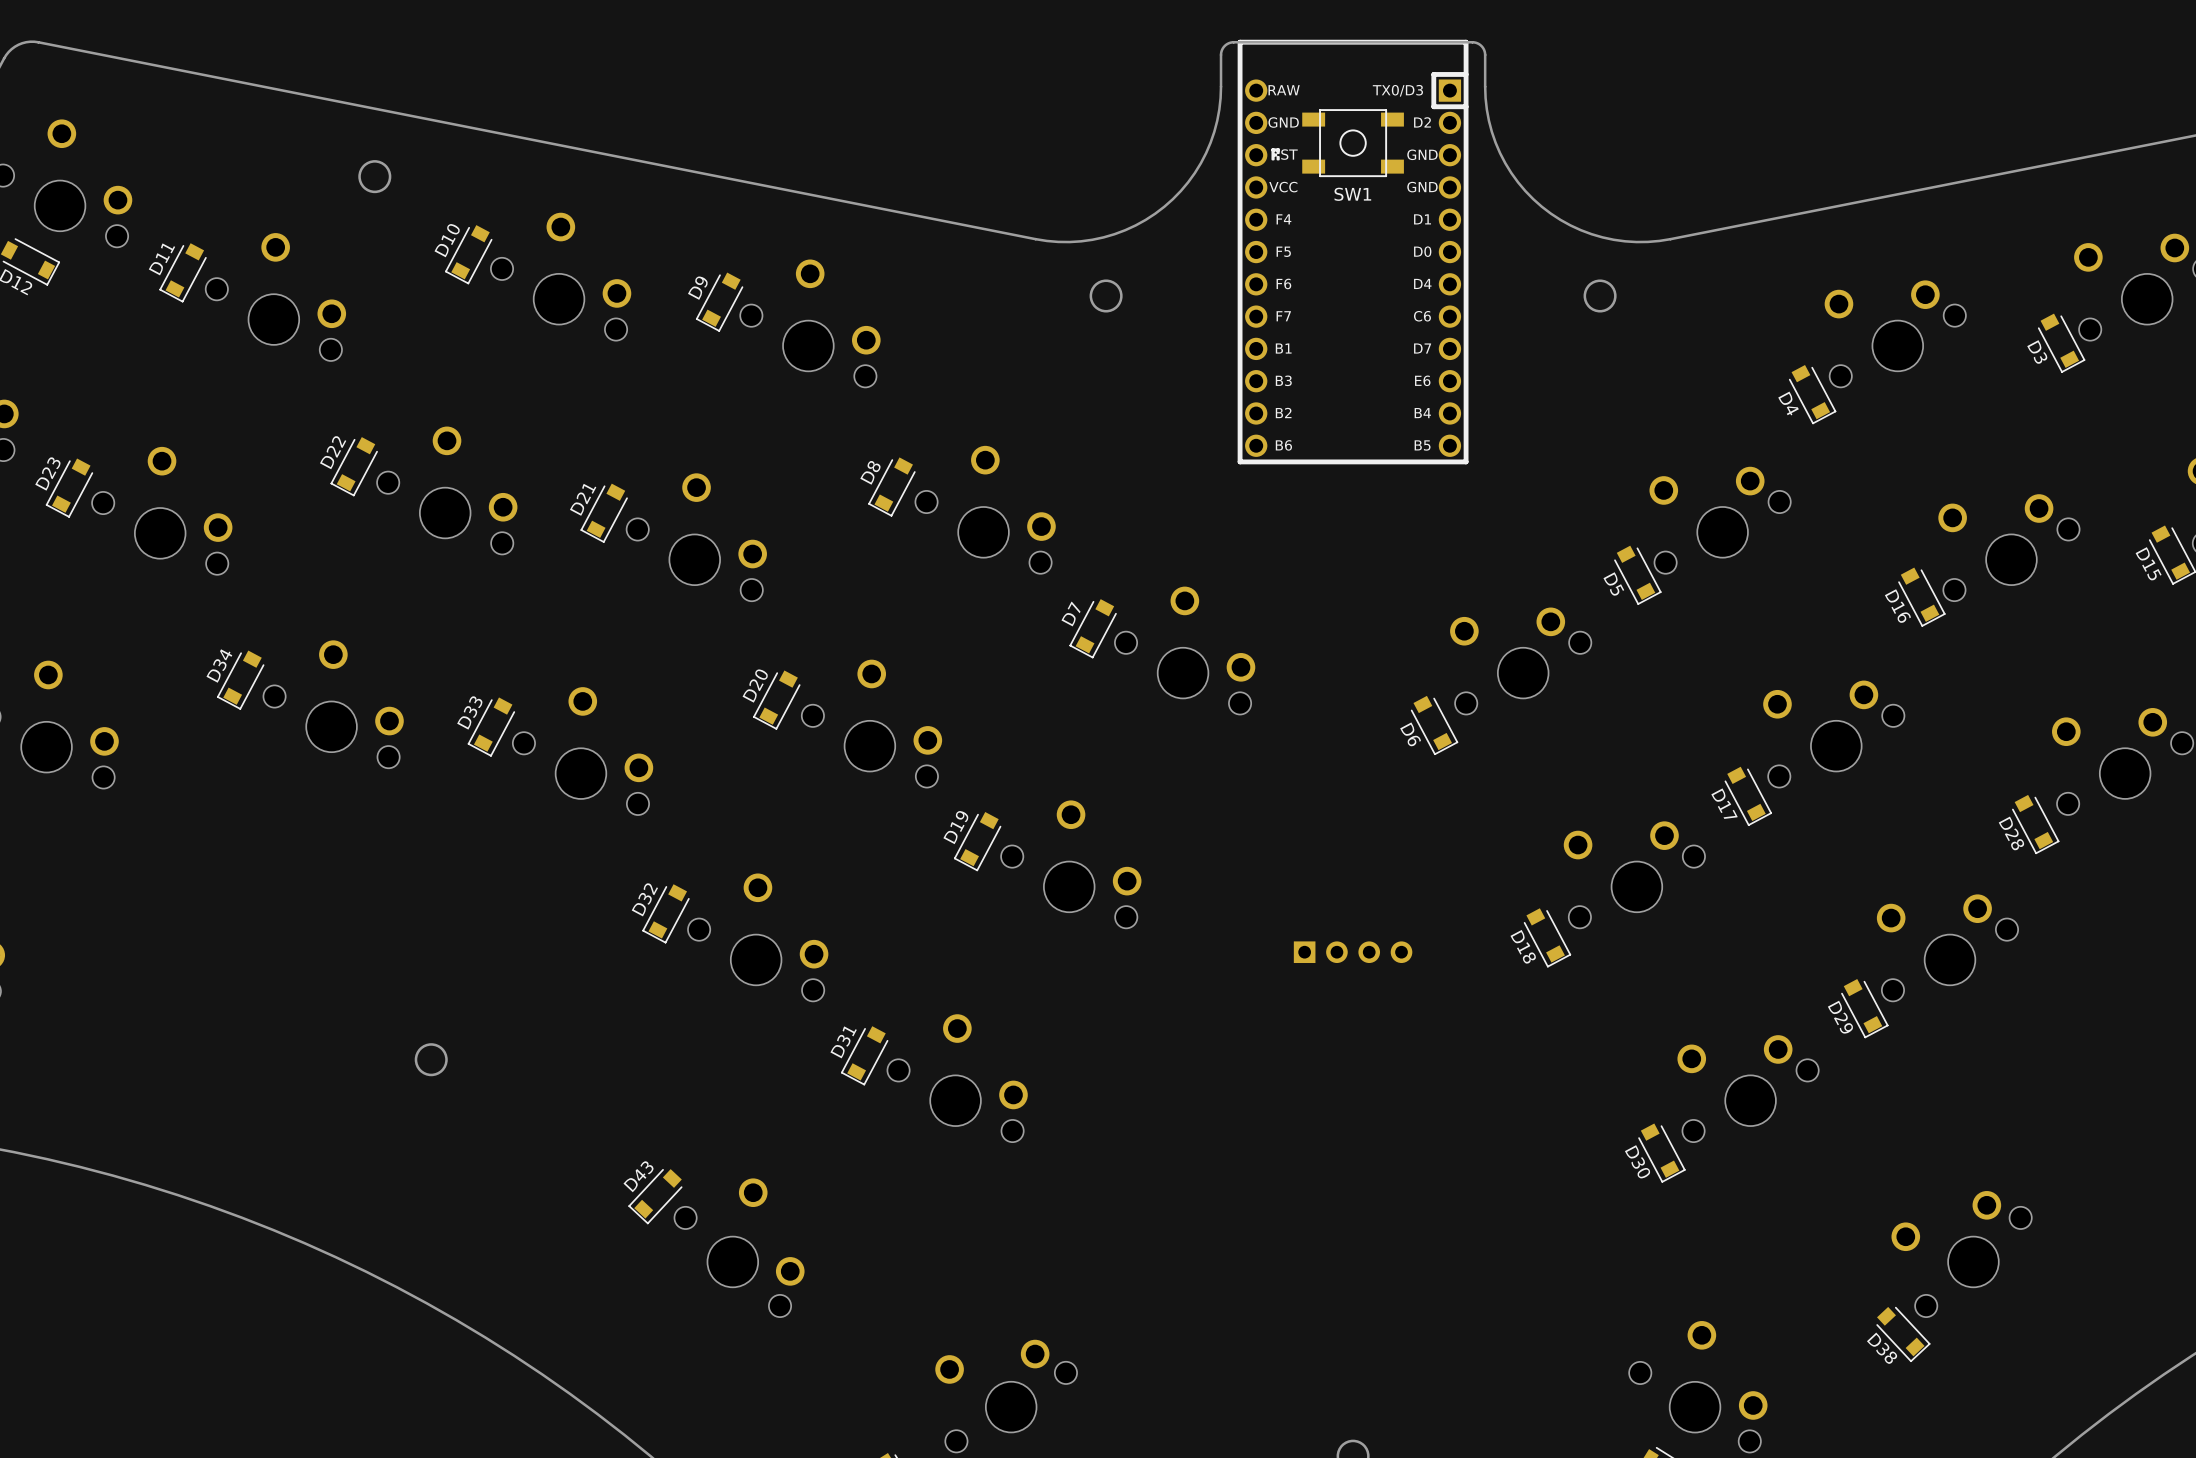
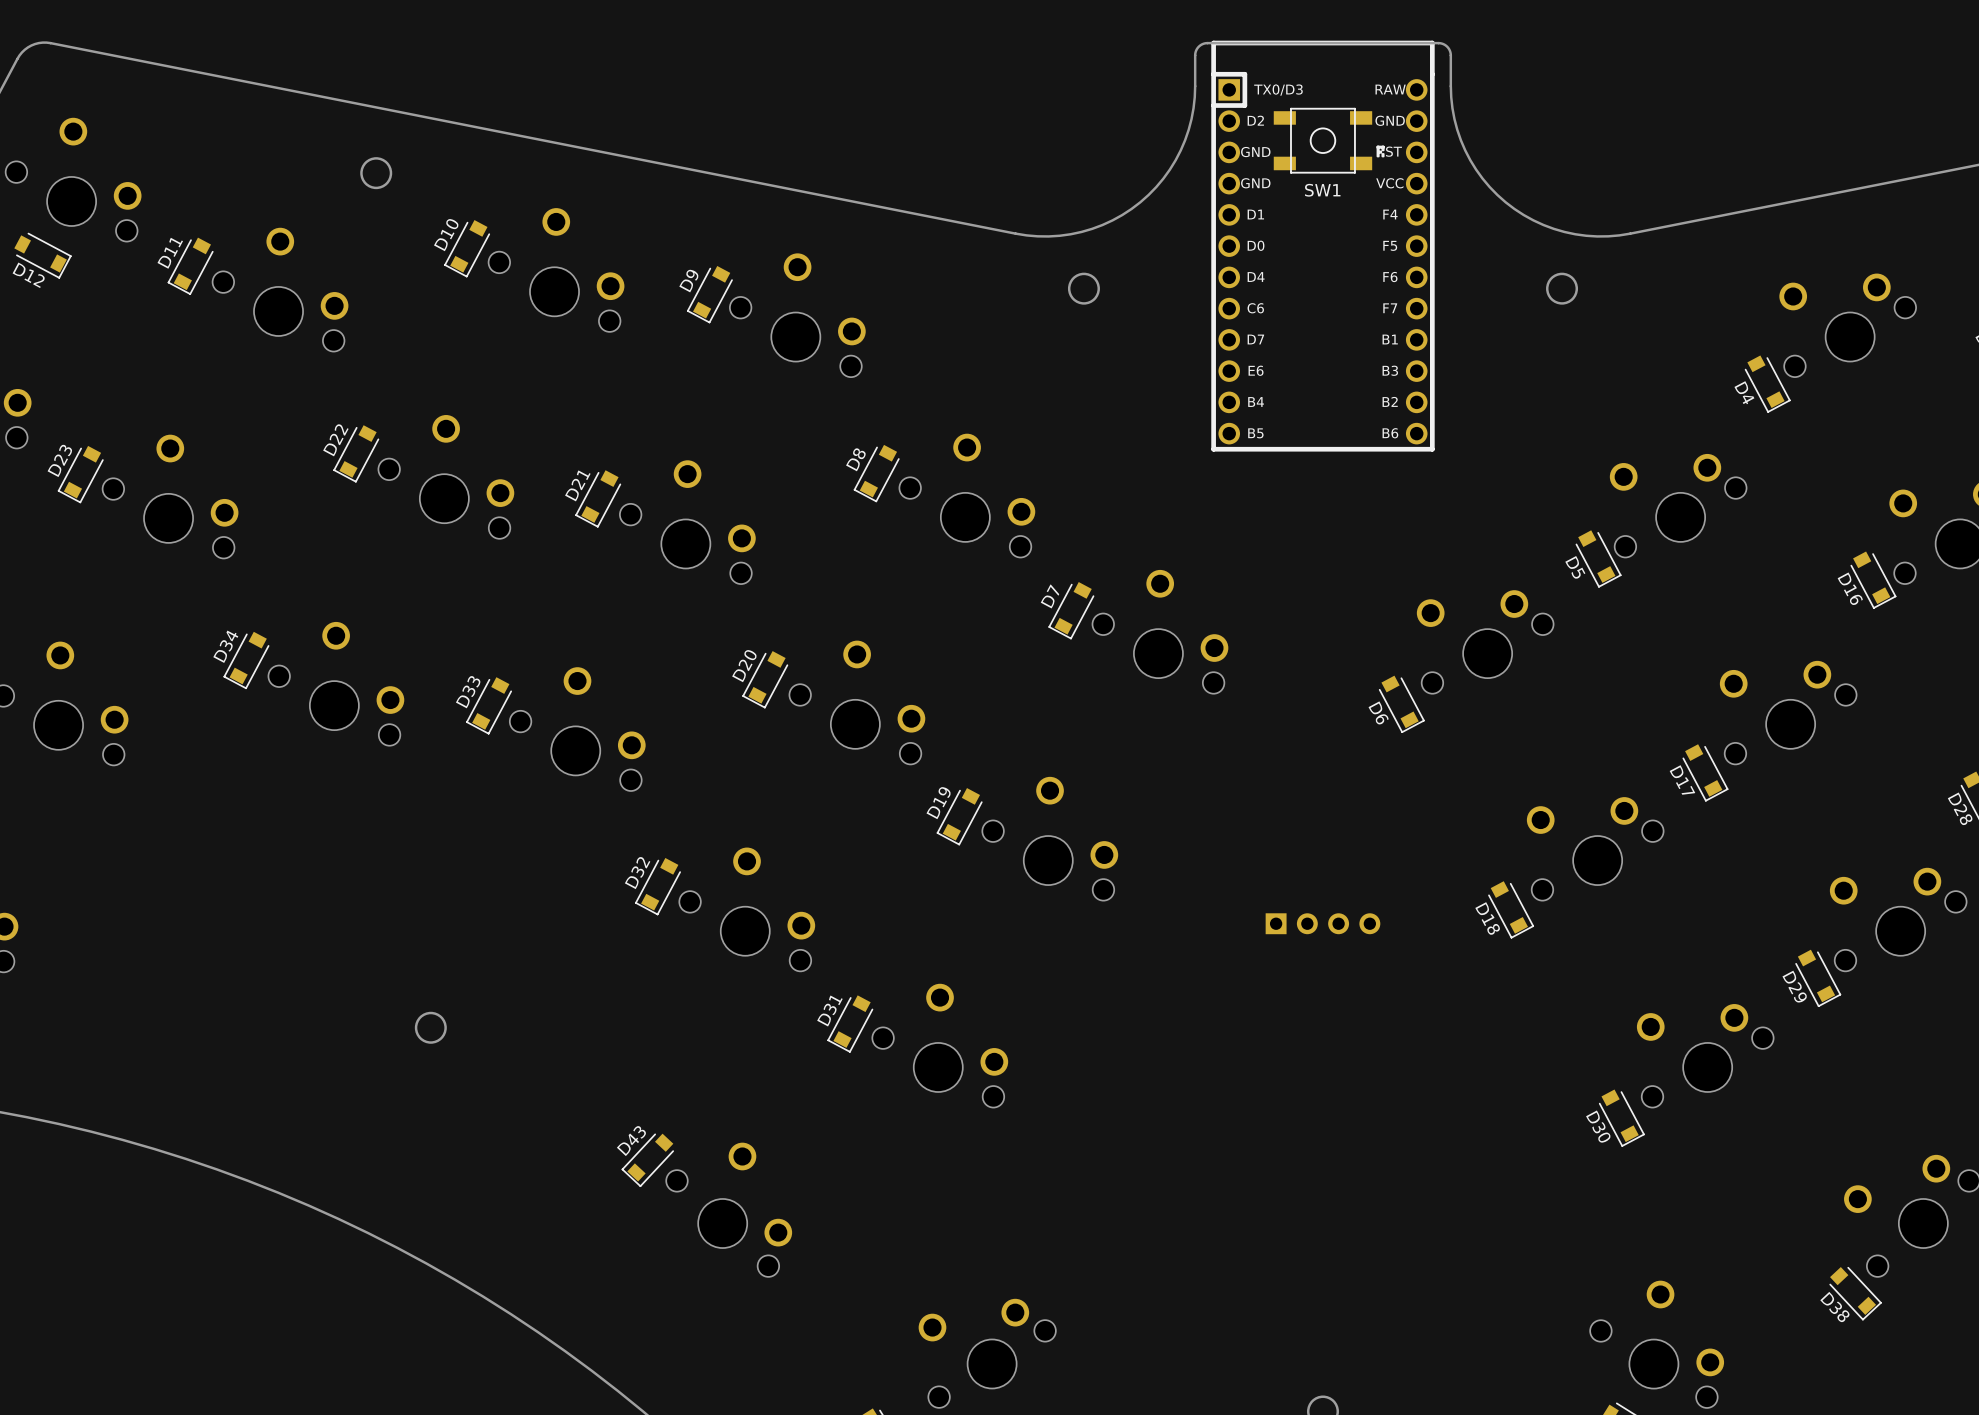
part side: top (1353, 252) -> bottom (1322, 246)

